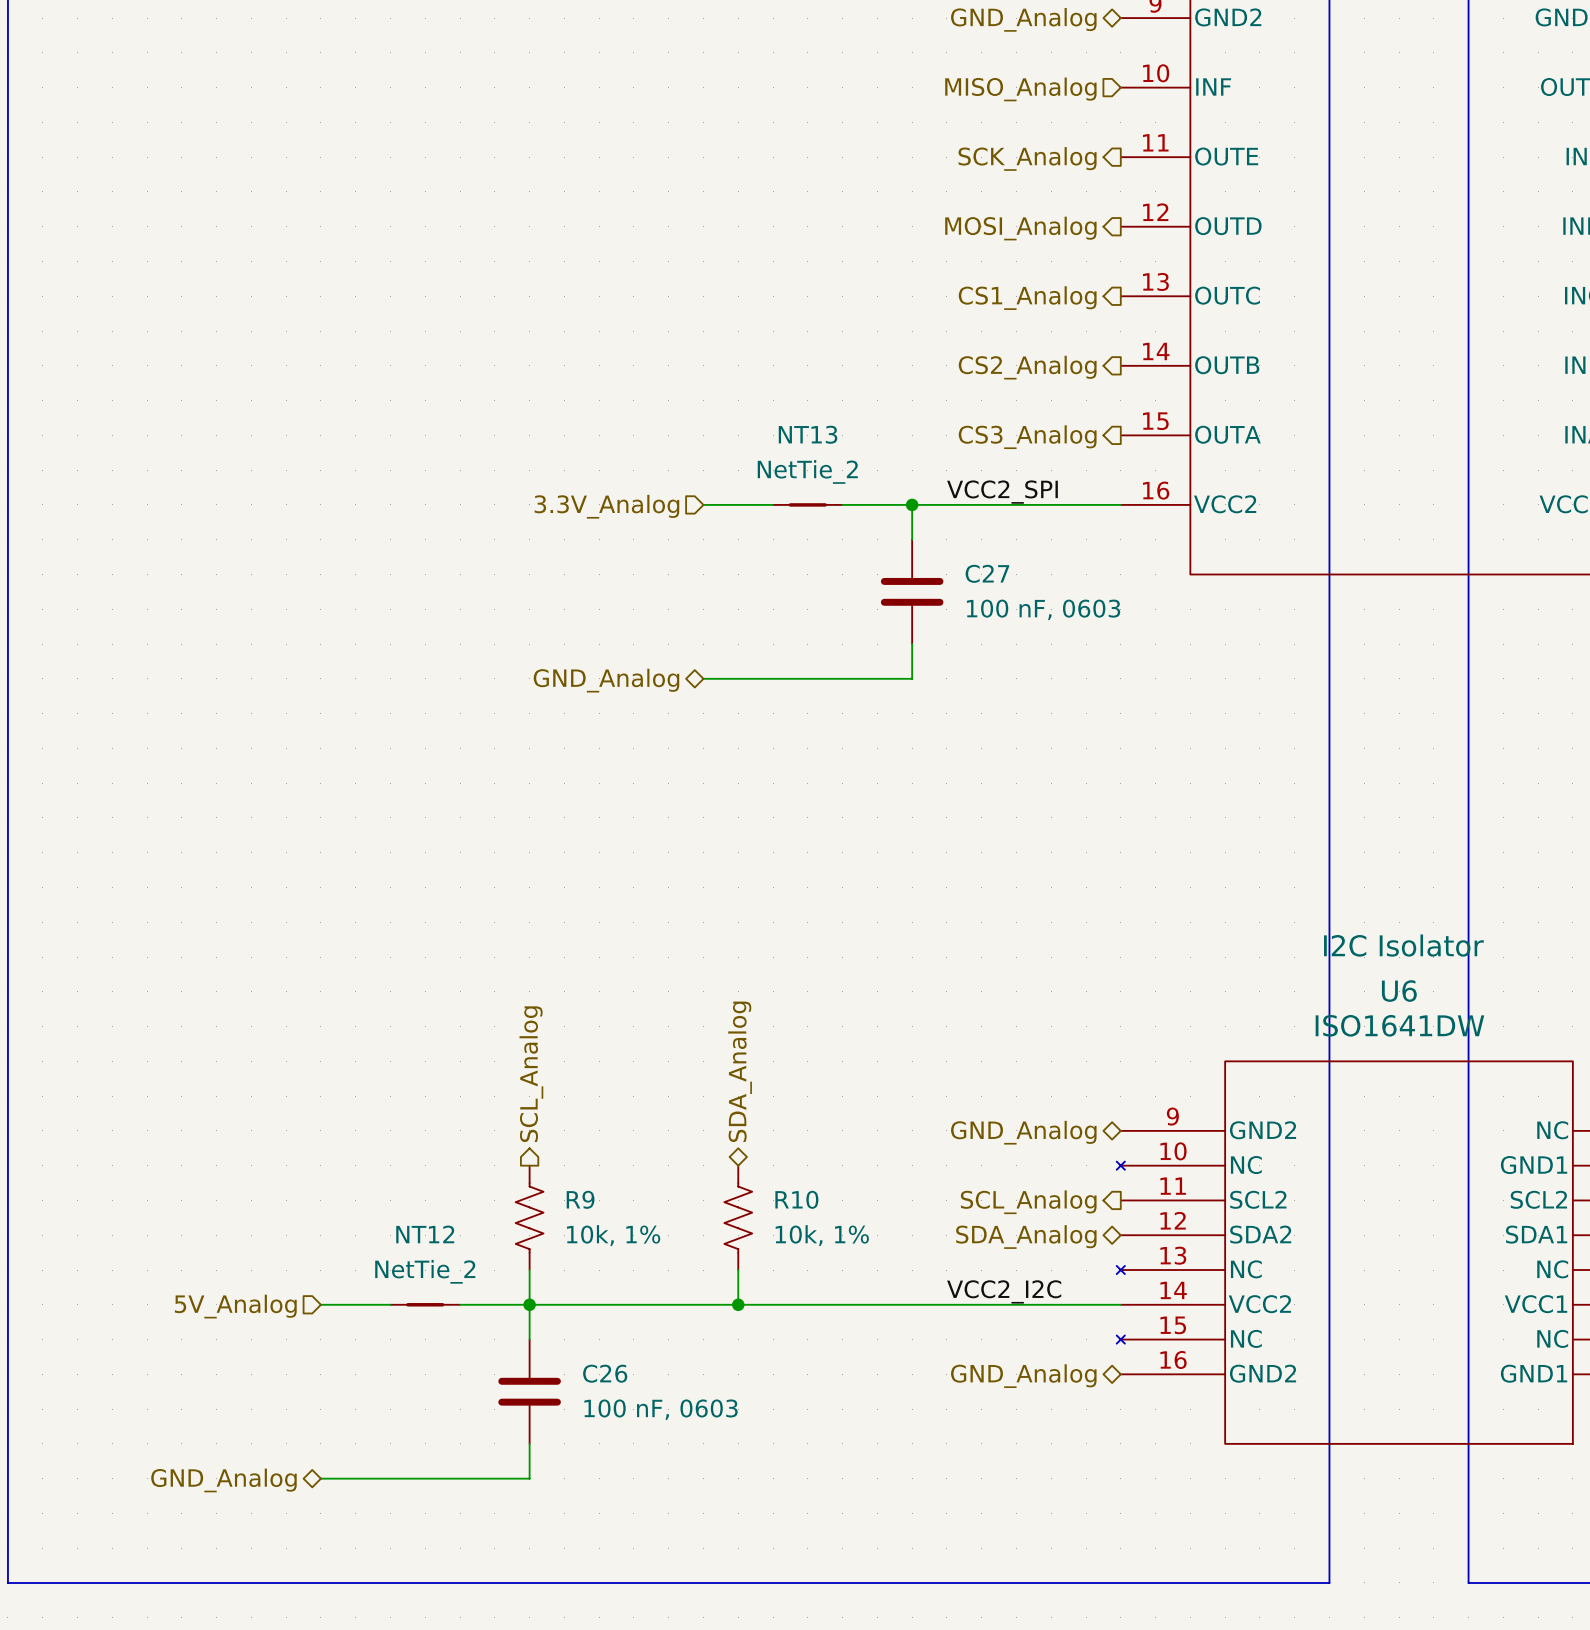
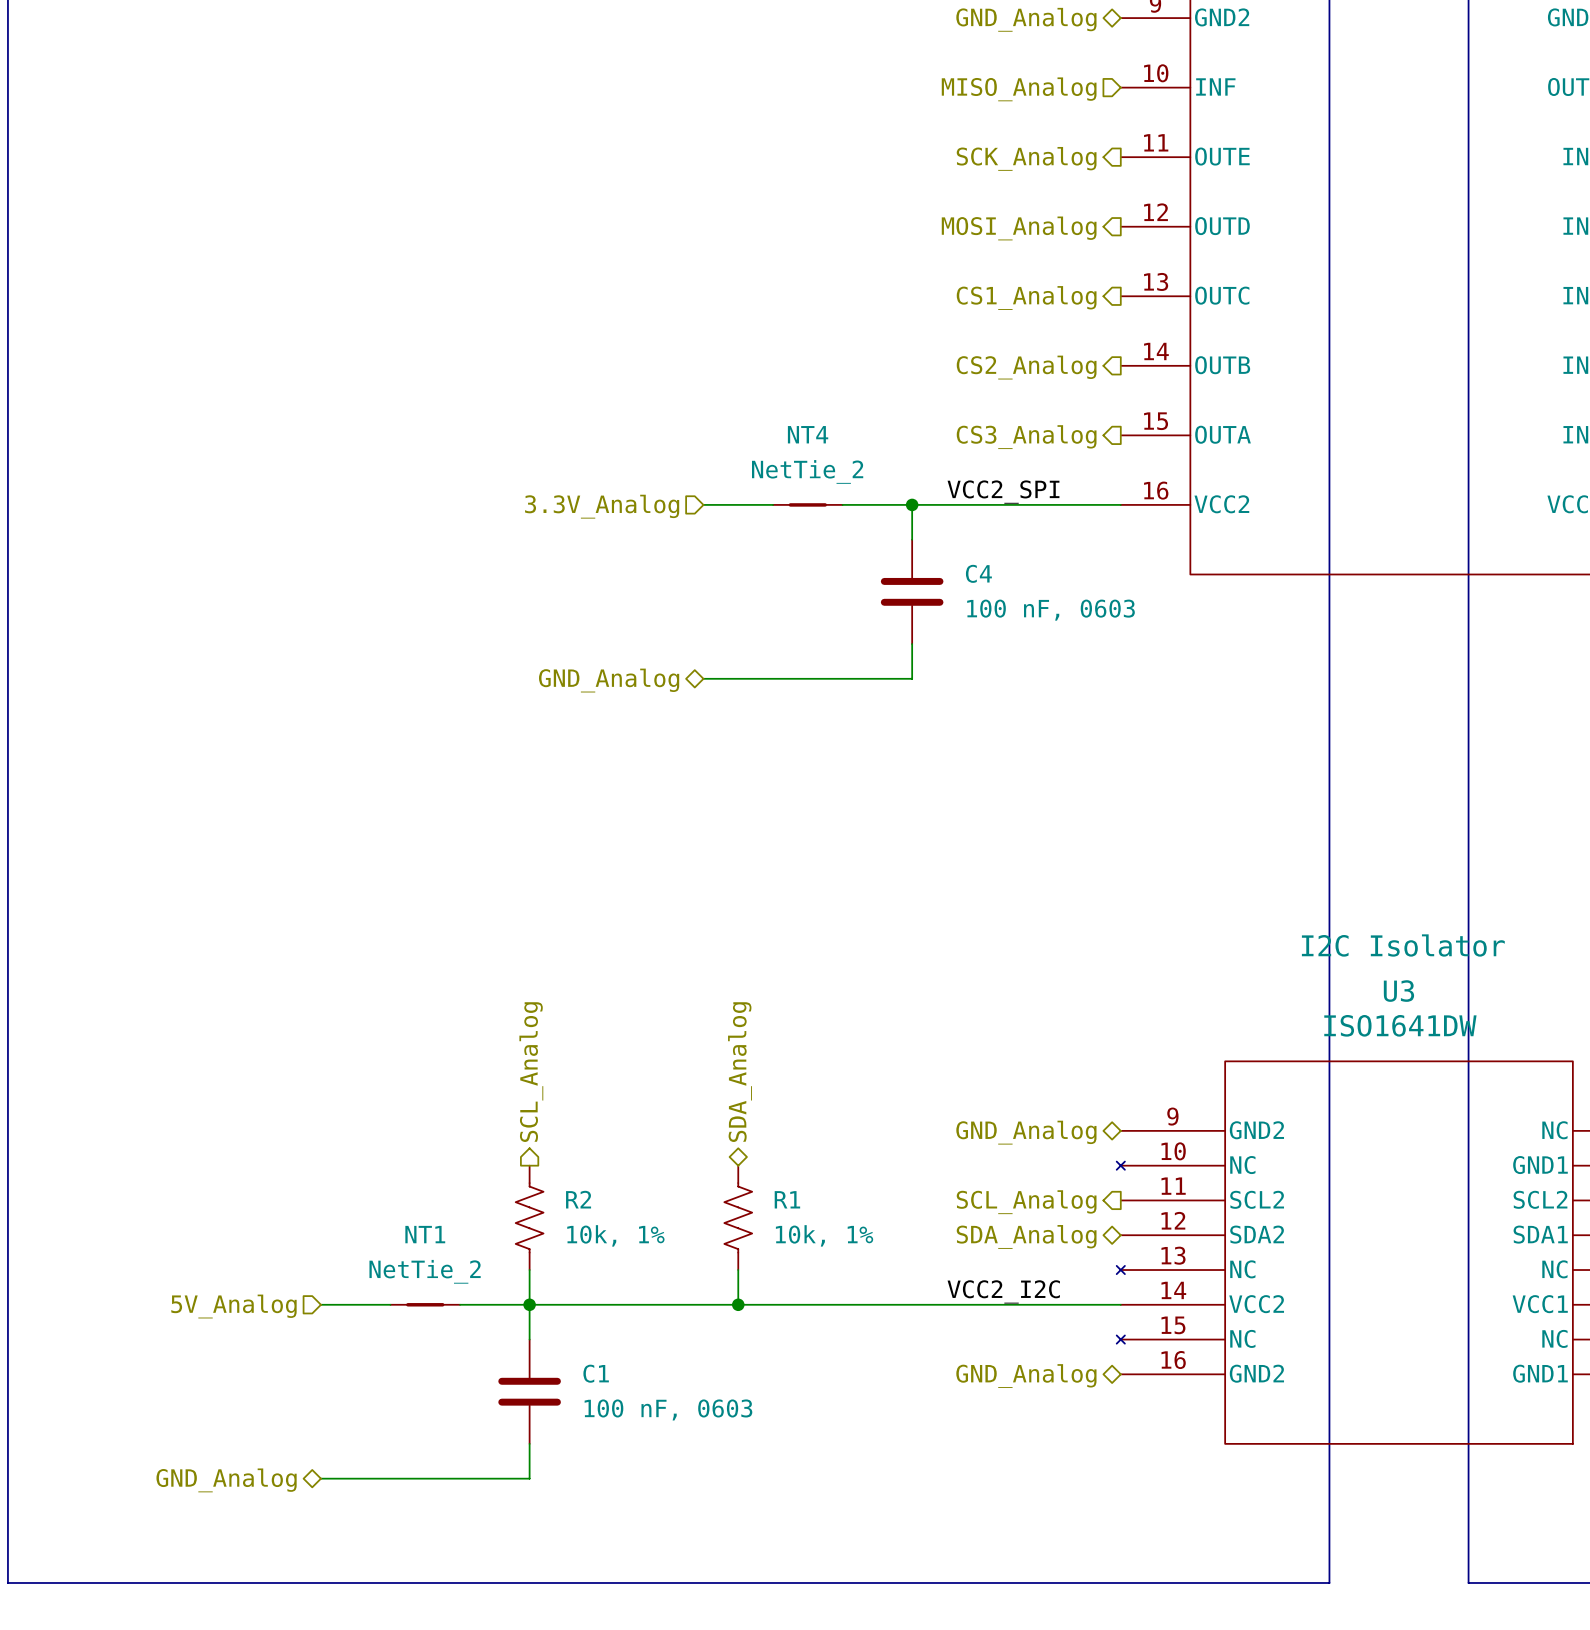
NT13 name: NT13 (808, 434) -> NT4 (808, 434)
C27 name: C27 (987, 573) -> C4 (978, 573)
U6 name: U6 (1399, 991) -> U3 (1398, 991)
R9 name: R9 (580, 1199) -> R2 (578, 1199)
R10 name: R10 (796, 1199) -> R1 (787, 1199)
NT12 name: NT12 (425, 1234) -> NT1 (425, 1234)
C26 name: C26 (605, 1373) -> C1 (596, 1373)

